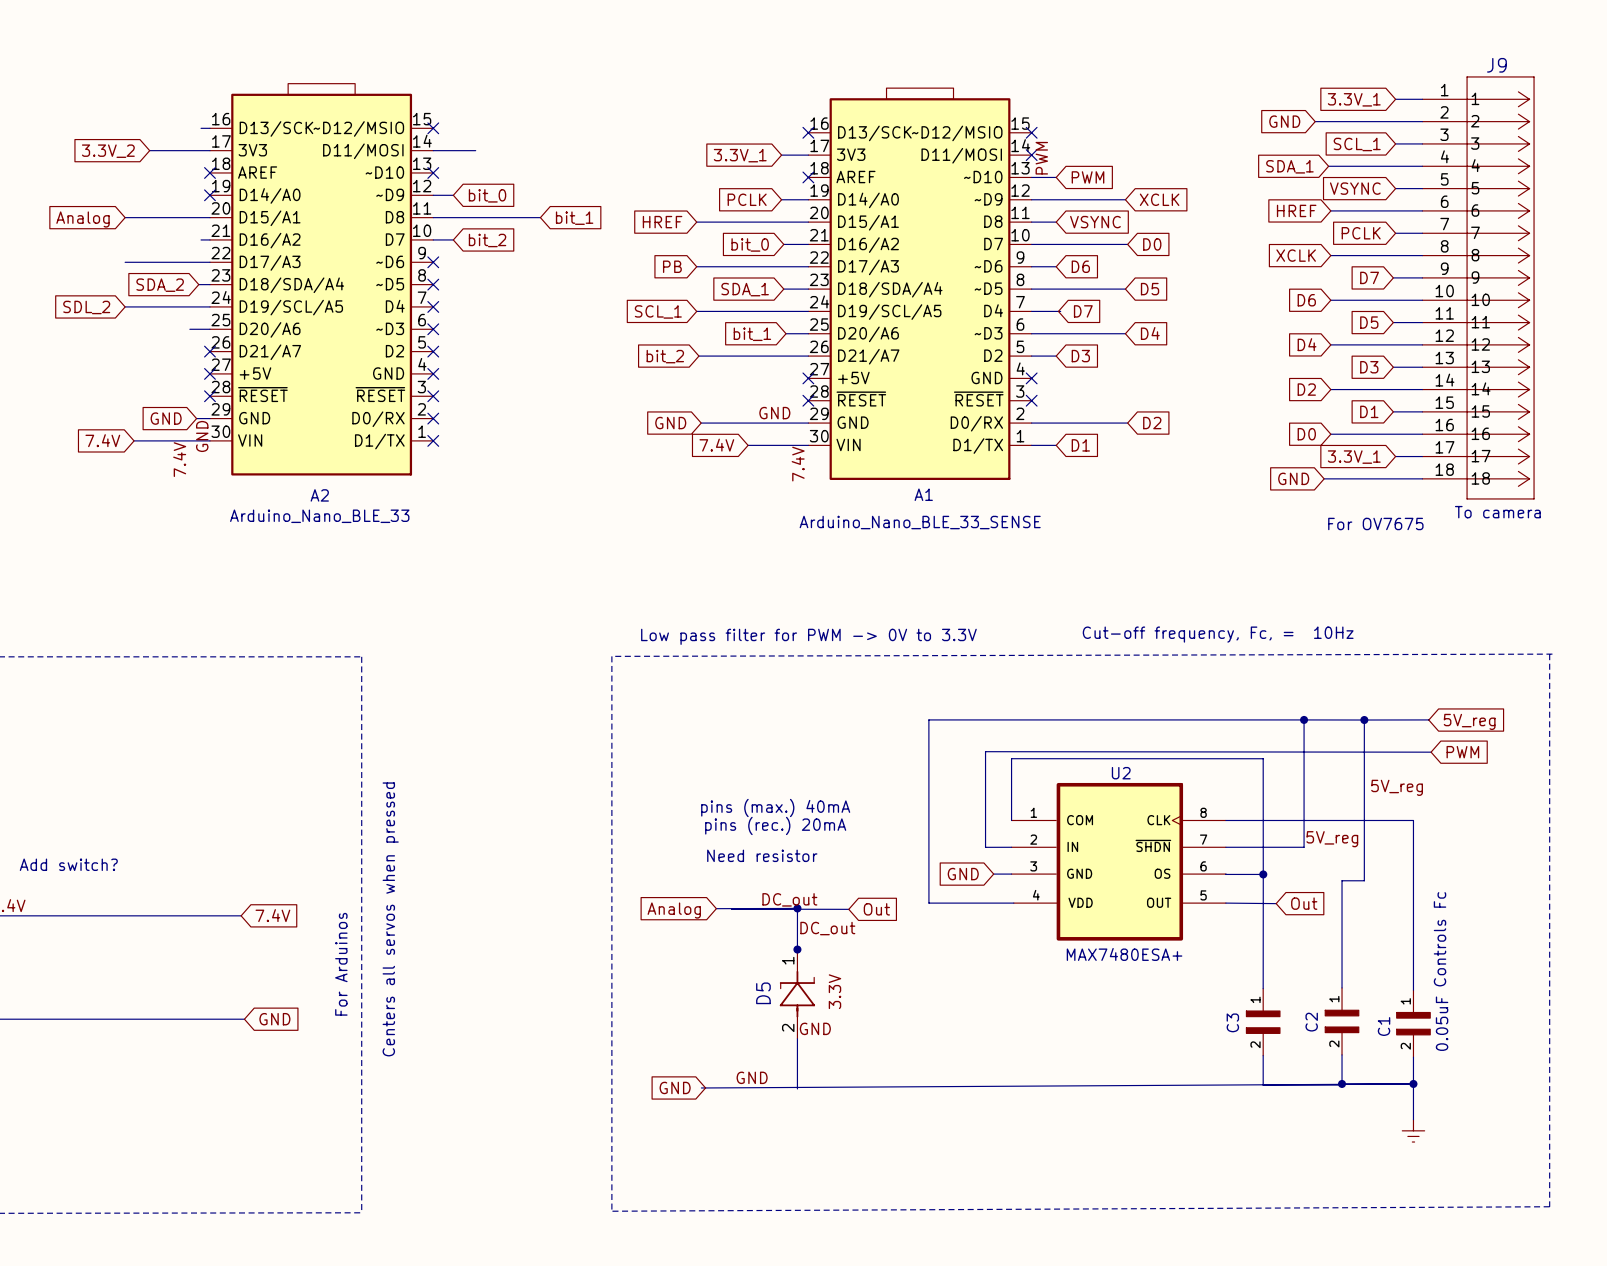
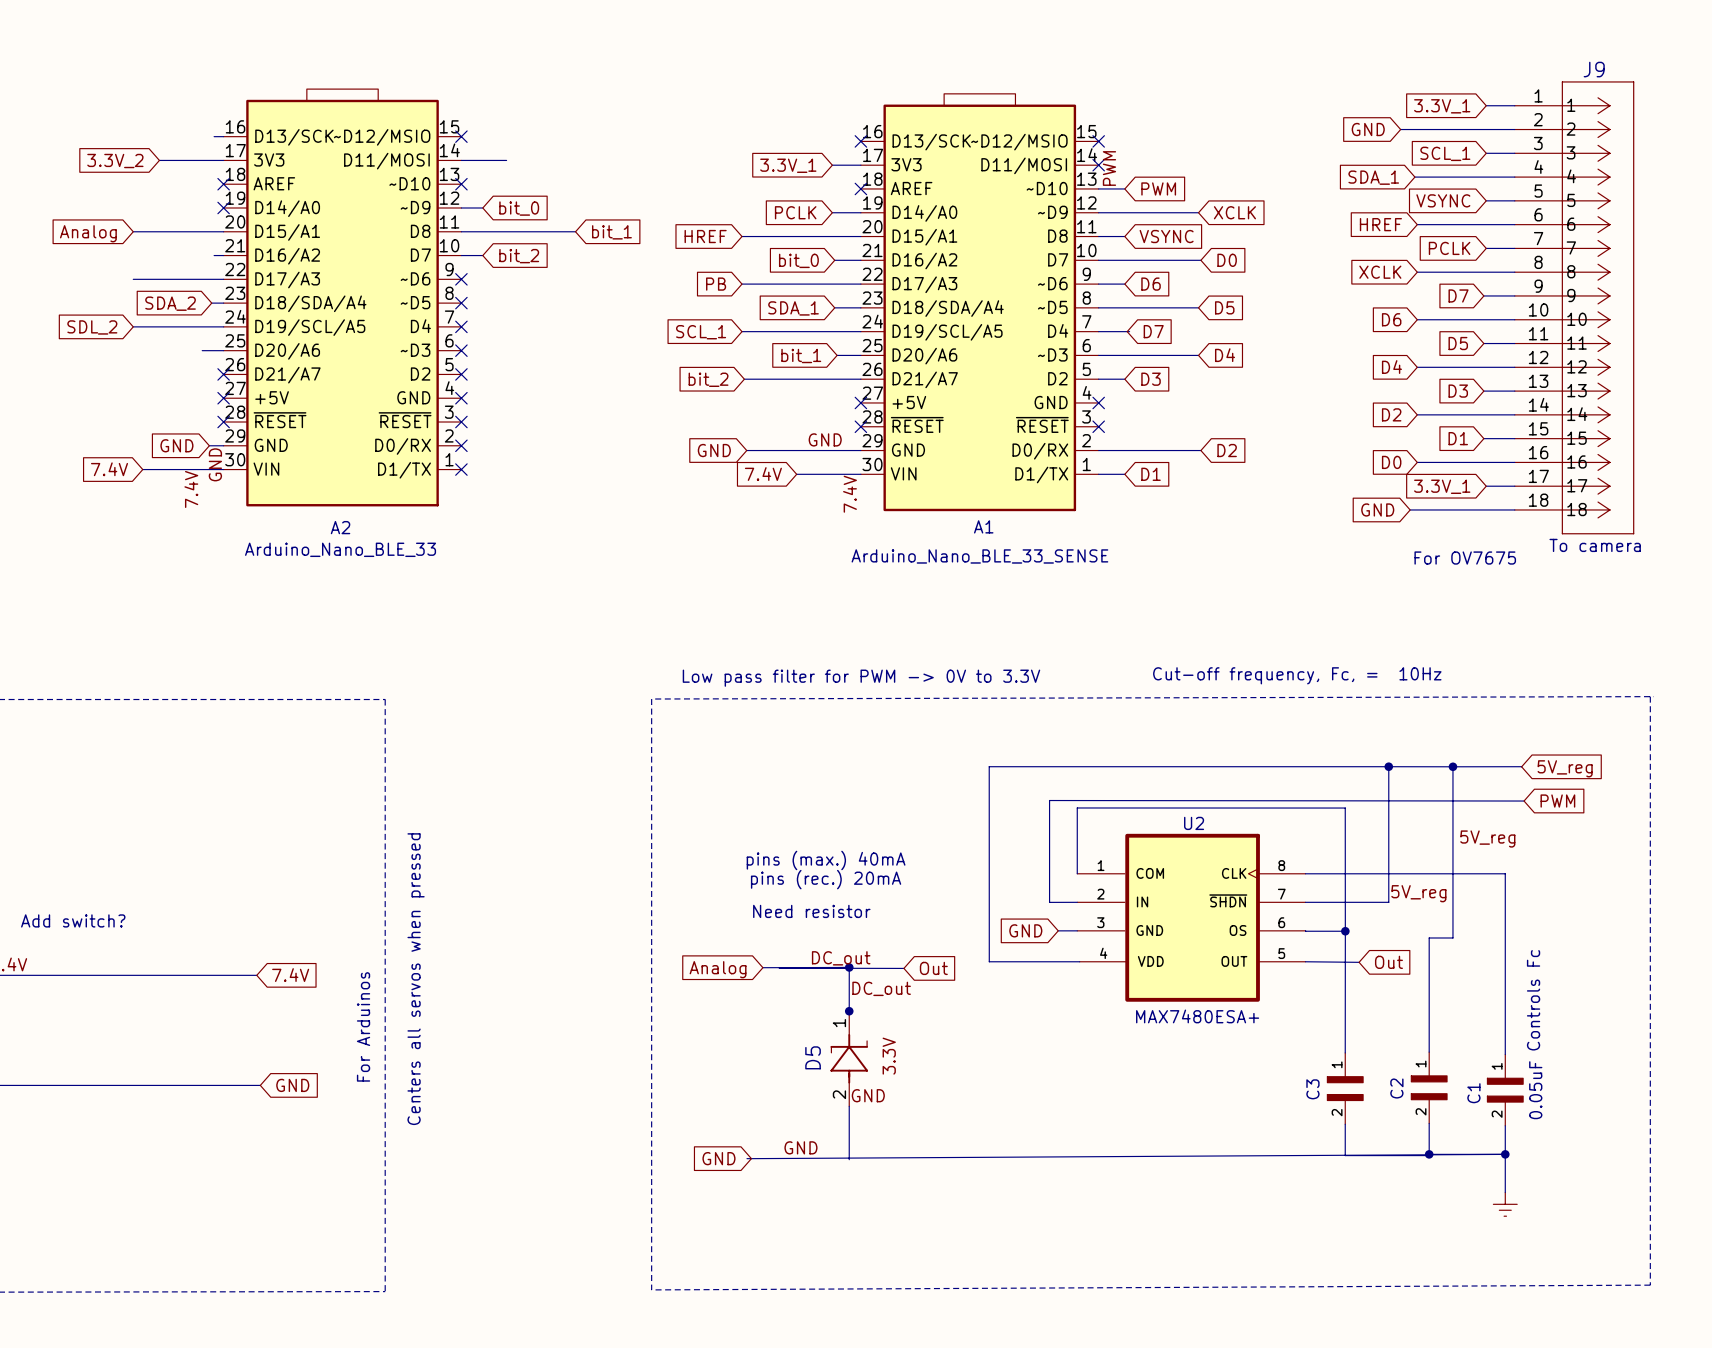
J9 symbol: [1422, 76, 1535, 500] -> [1514, 81, 1635, 535]

